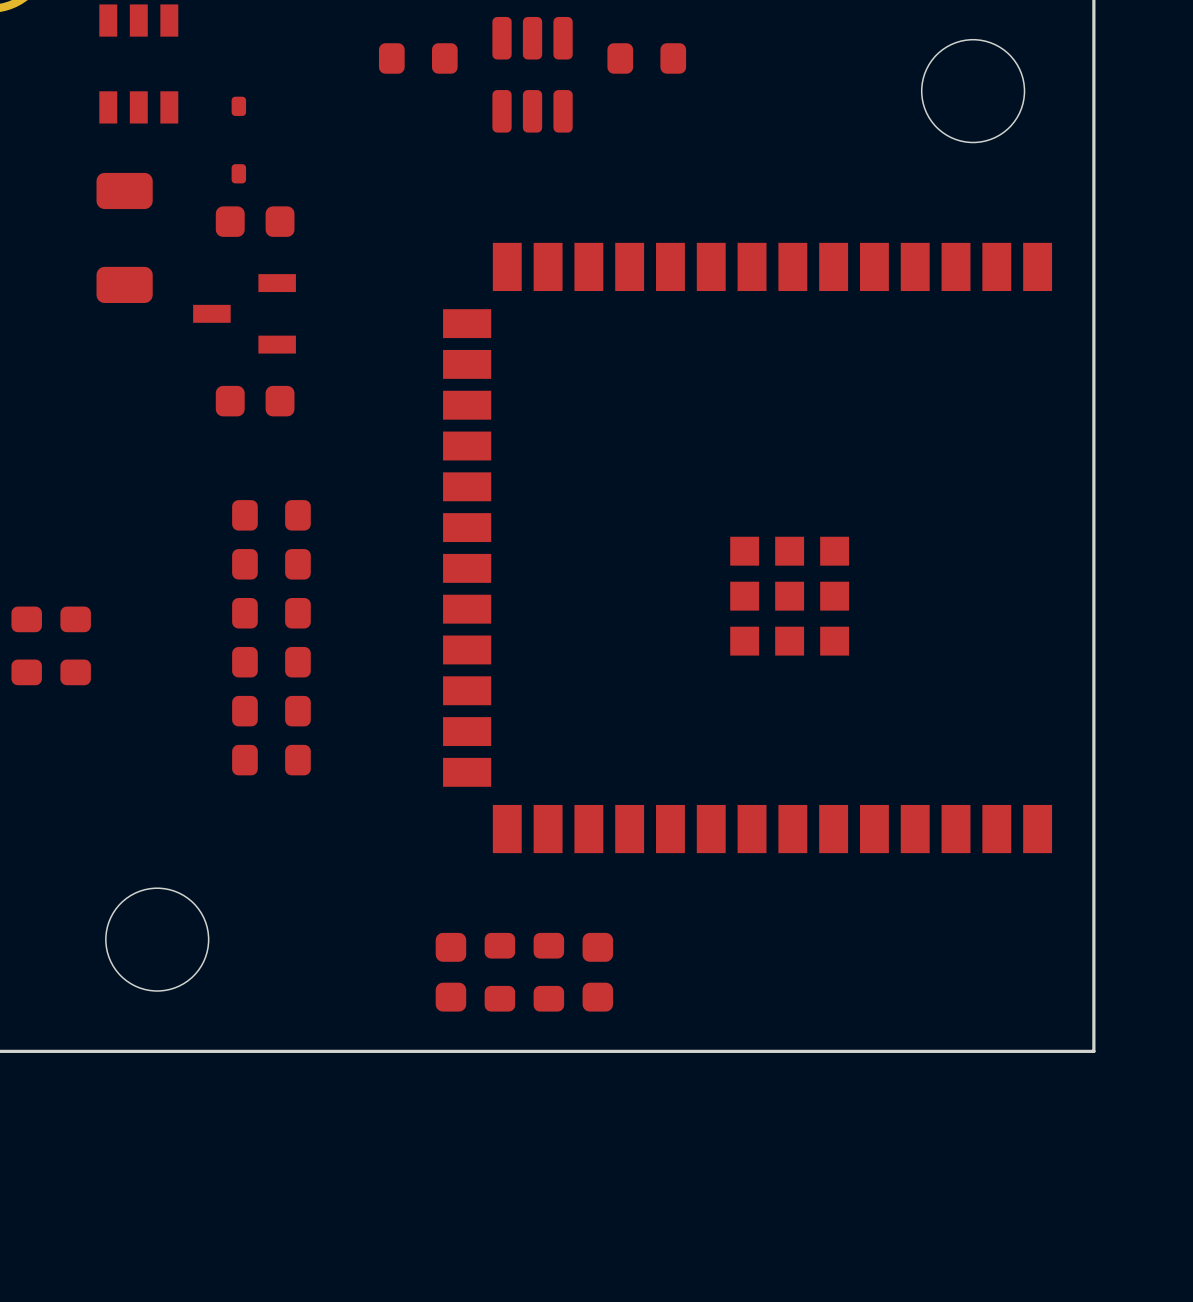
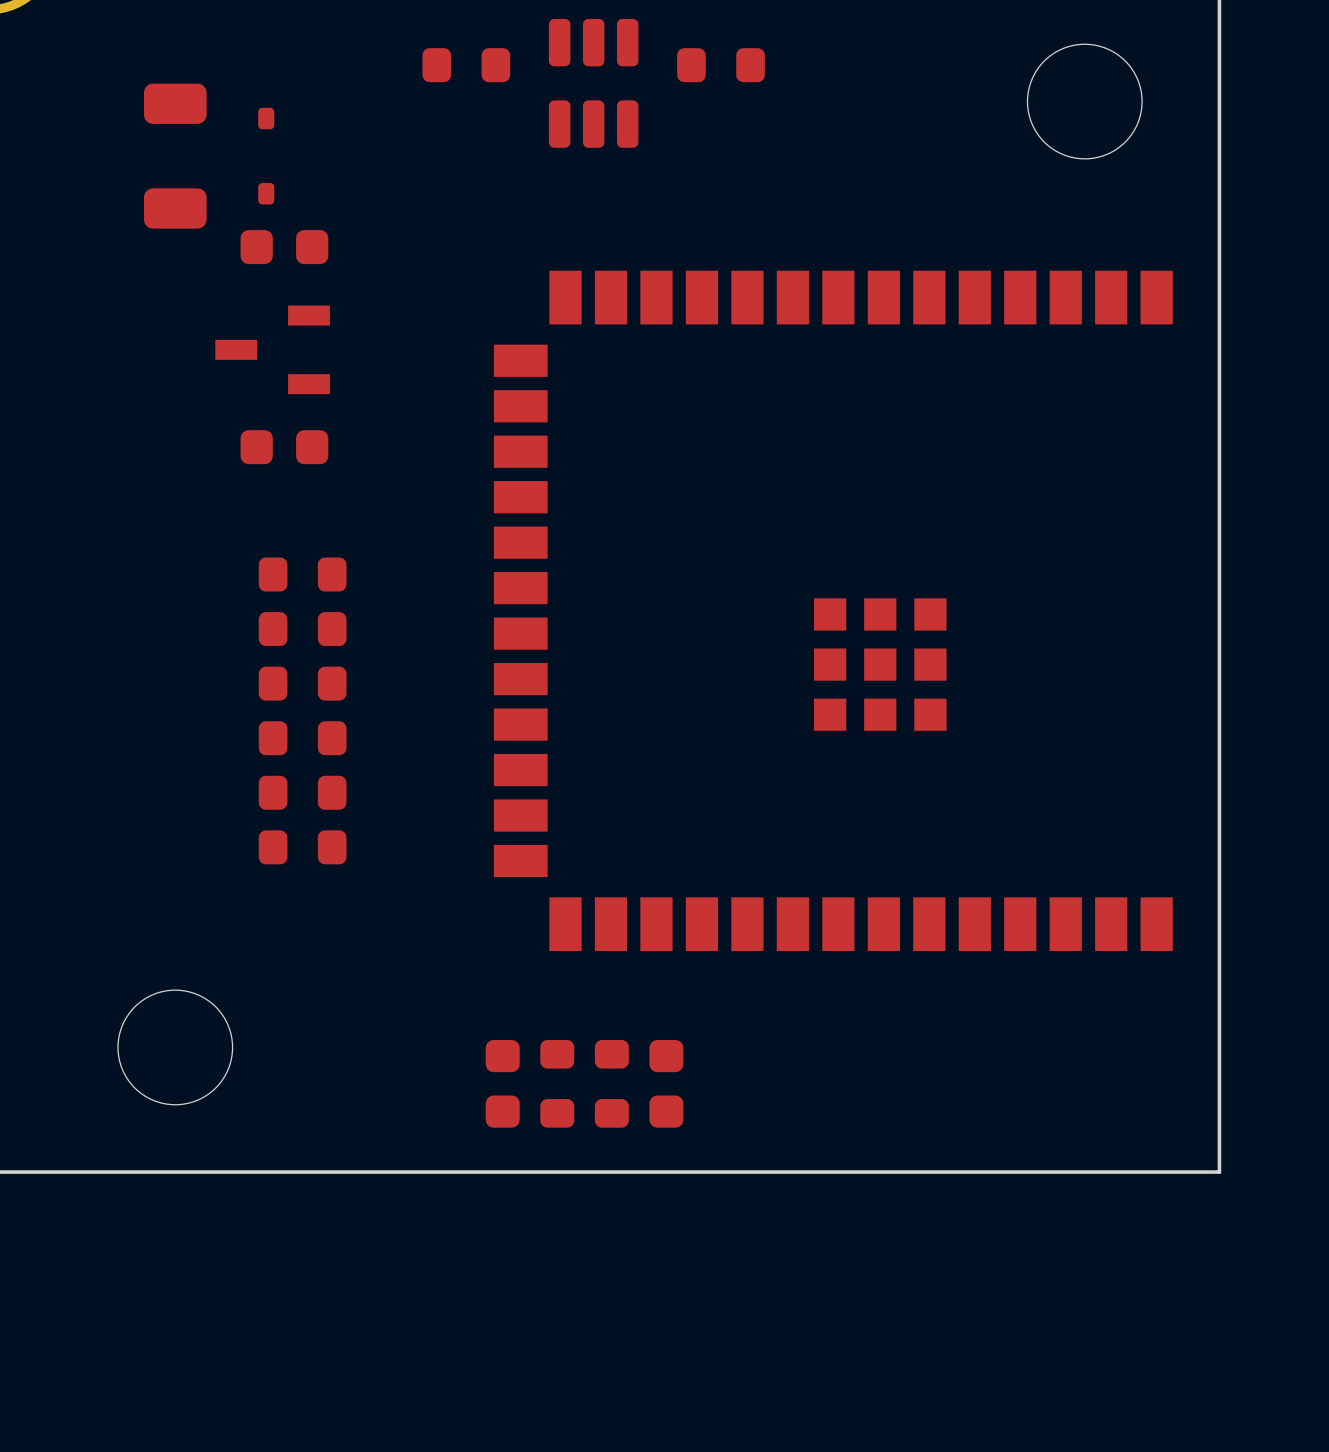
part: (138, 63) -> none
part position: (124, 237) -> (175, 156)
part: (26, 645) -> none
part: (75, 645) -> none

